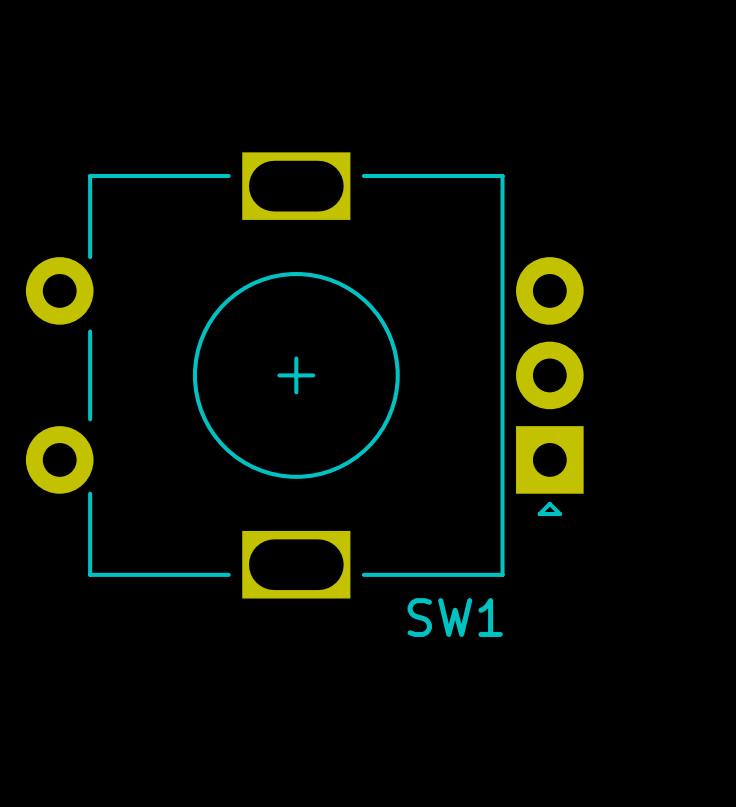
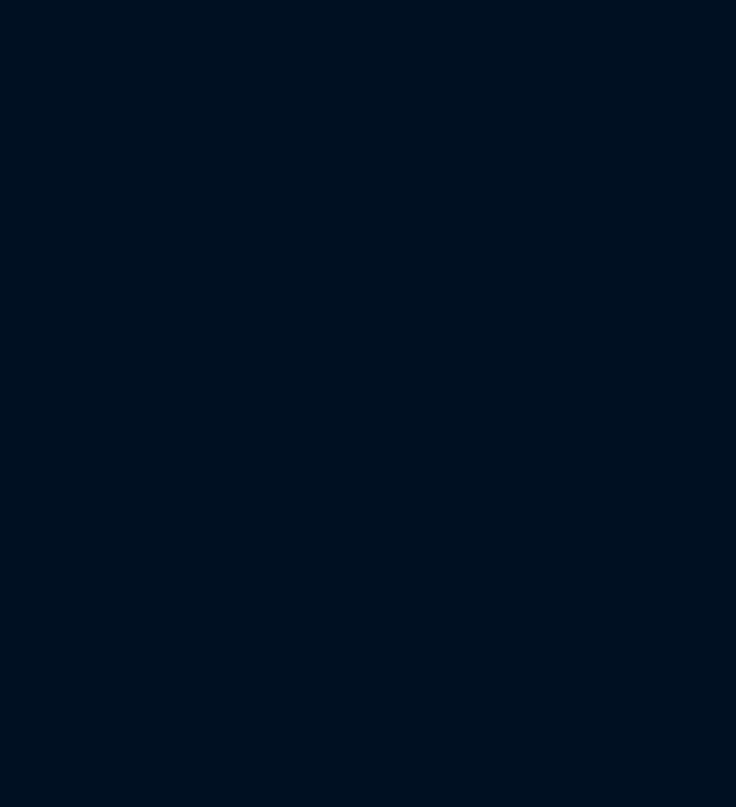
SW1: (304, 375) -> none

